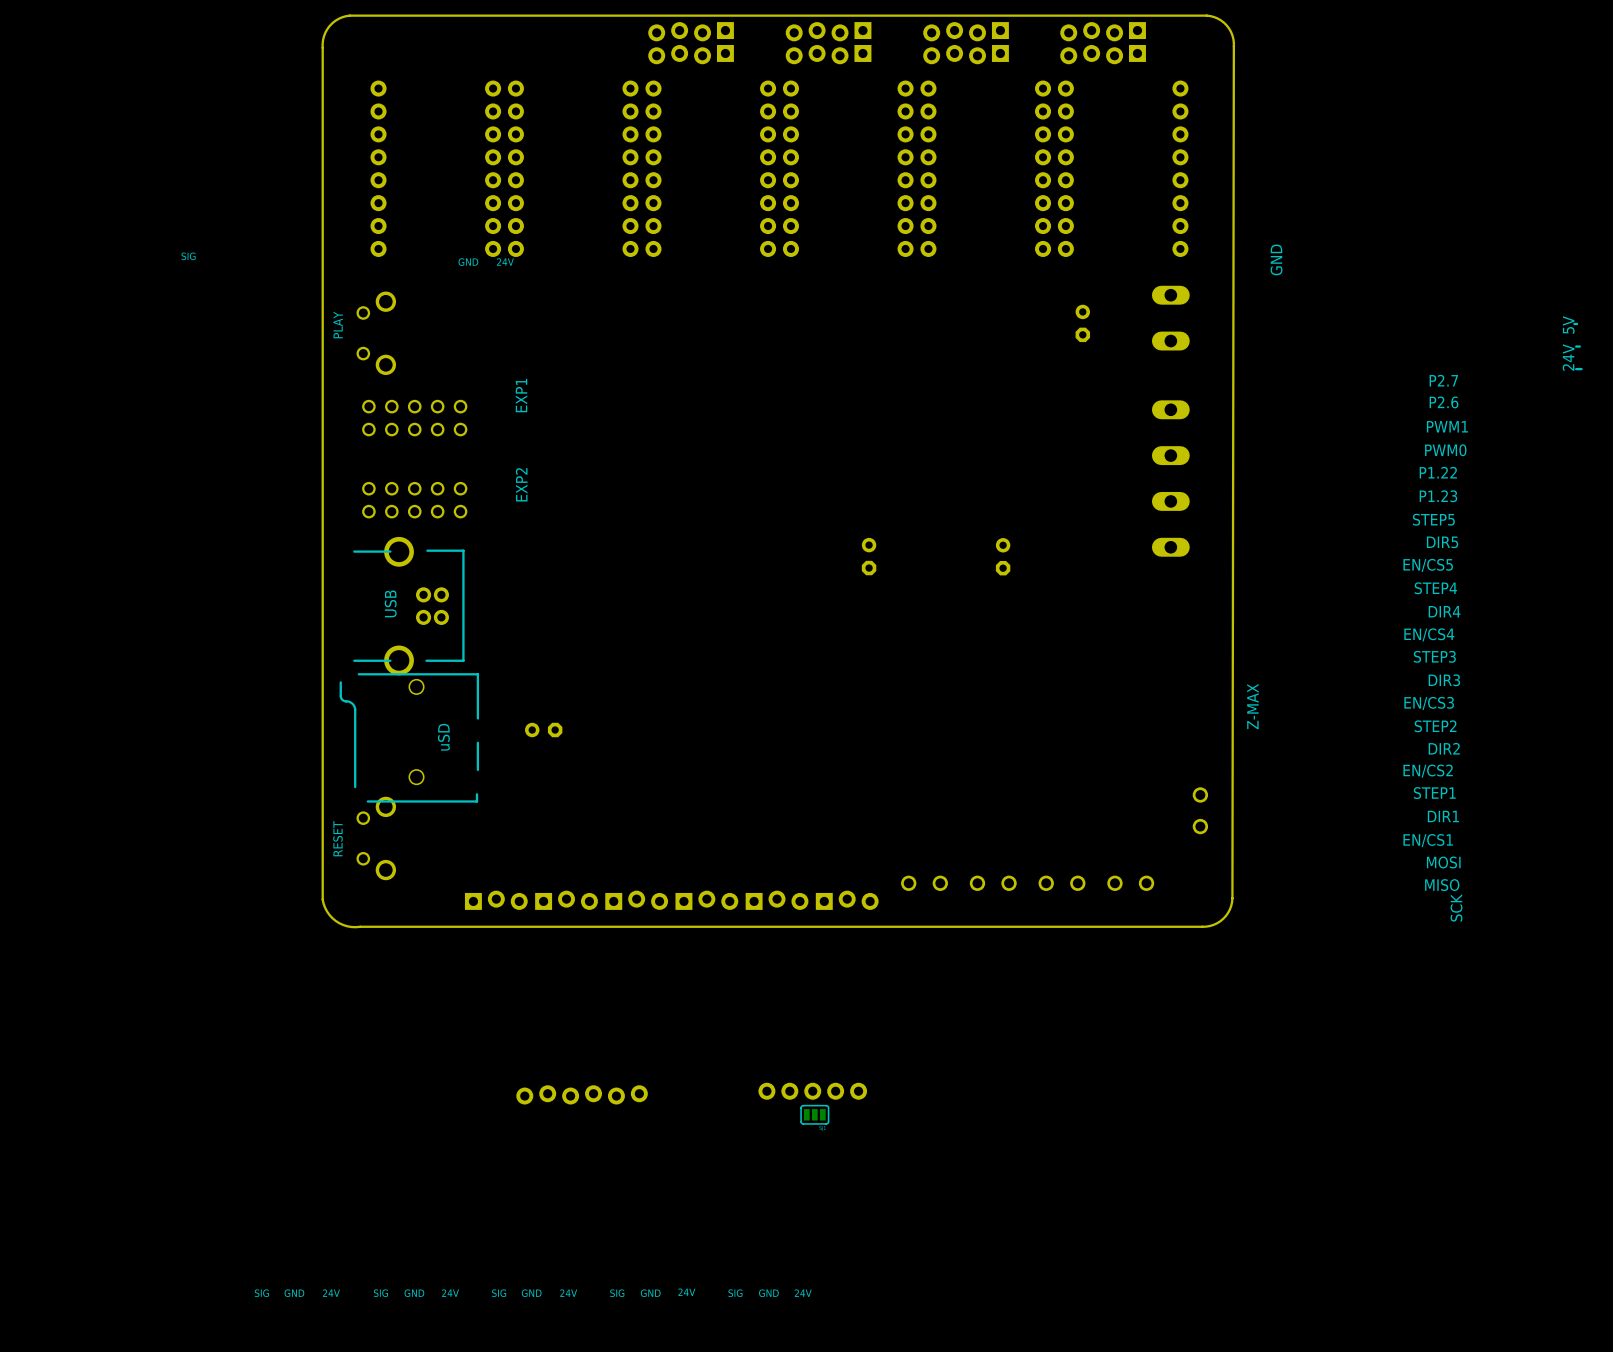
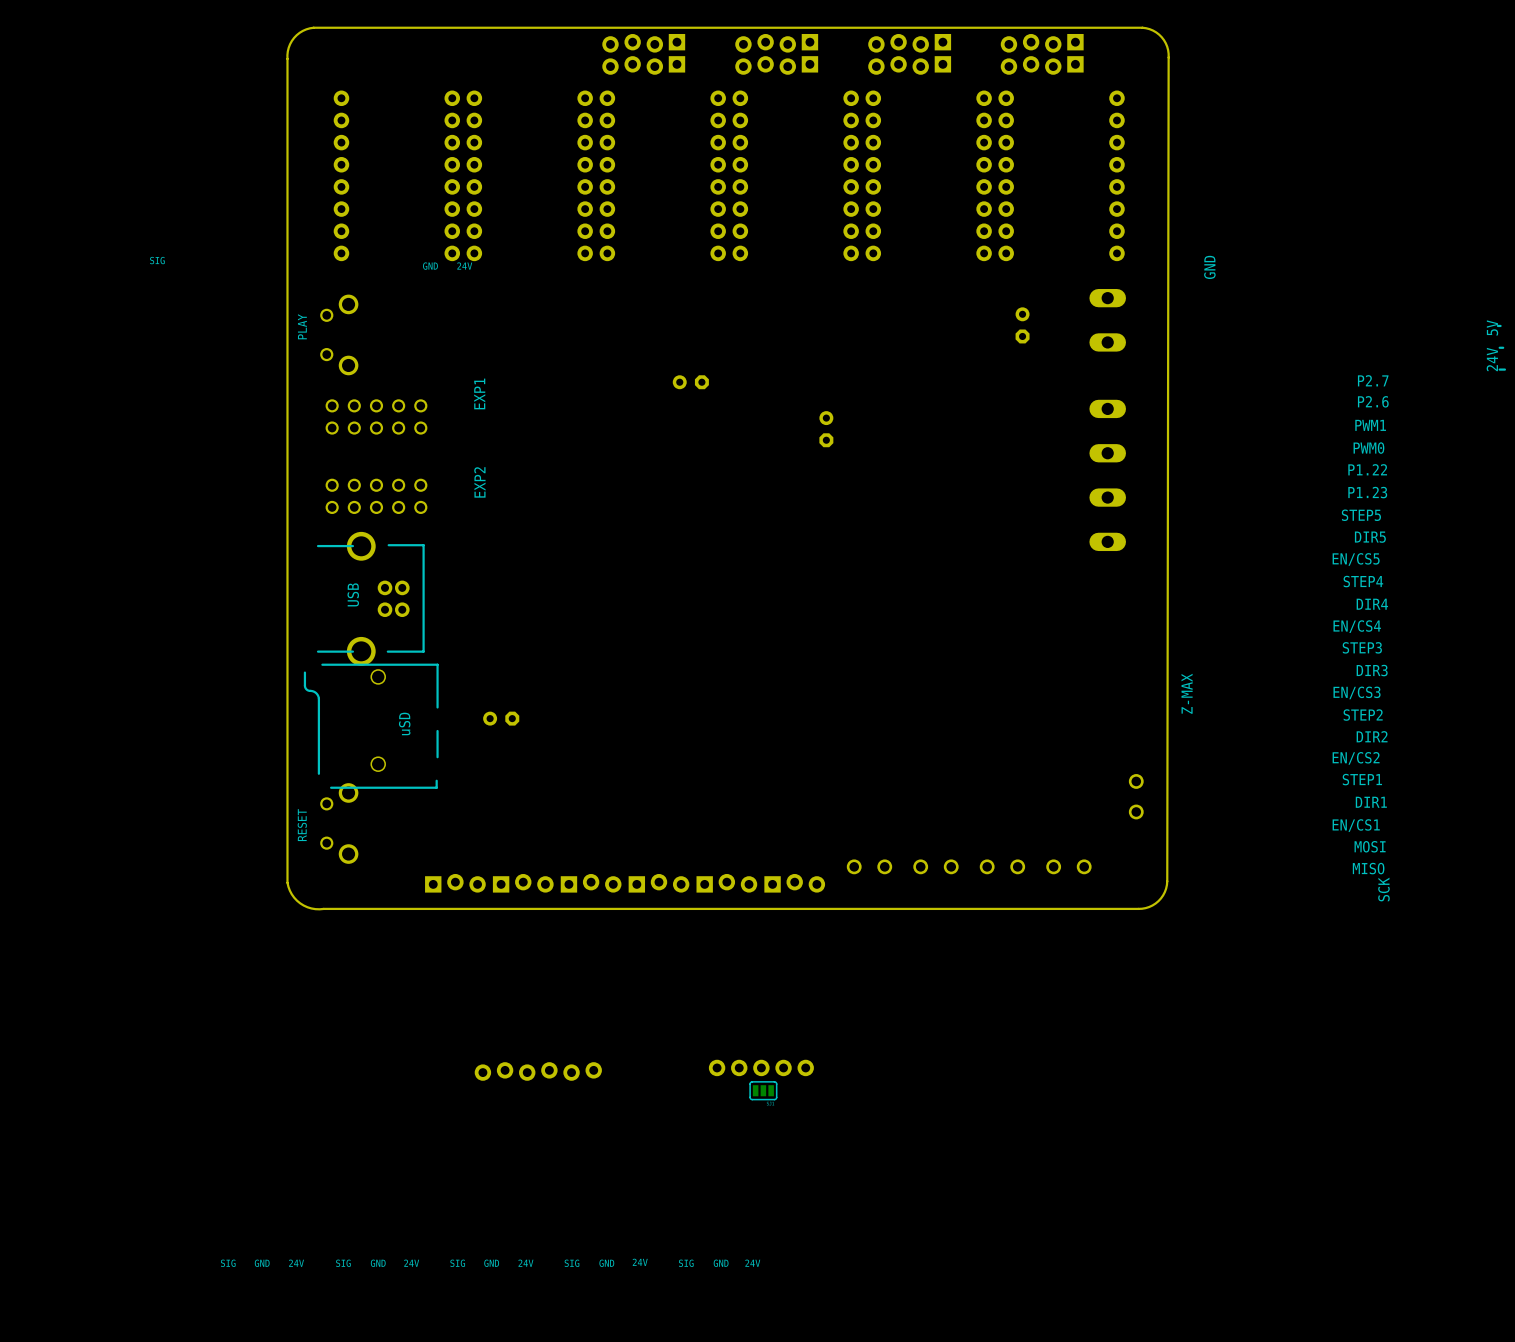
part: none -> (690, 382)
part: none -> (826, 429)
part: (869, 556) -> none
part: (1003, 556) -> none

